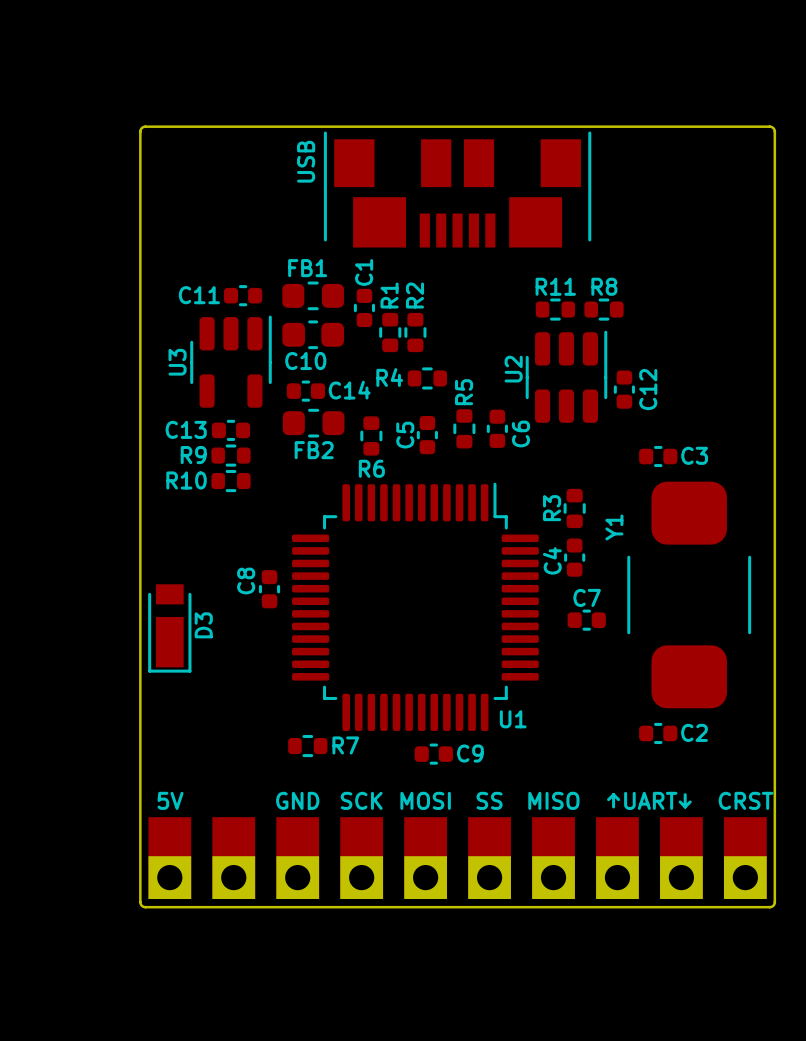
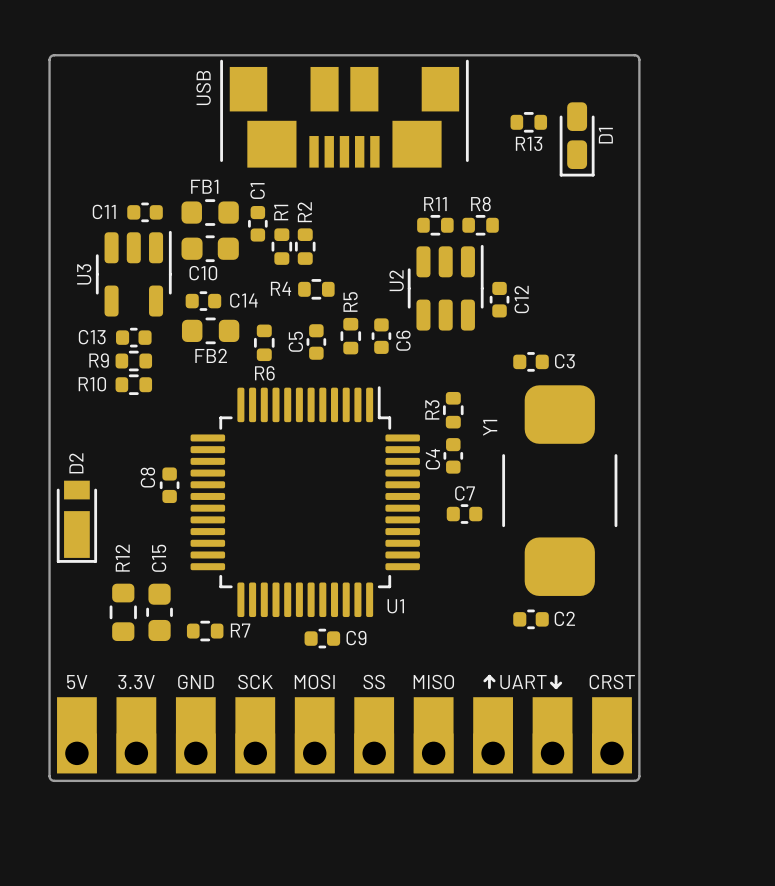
R13: none -> (528, 122)
D1: none -> (577, 139)
D3 name: D3 (203, 625) -> D2 (76, 463)
R12: none -> (123, 612)
C15: none -> (159, 612)
text: none -> 3.3V (136, 682)

